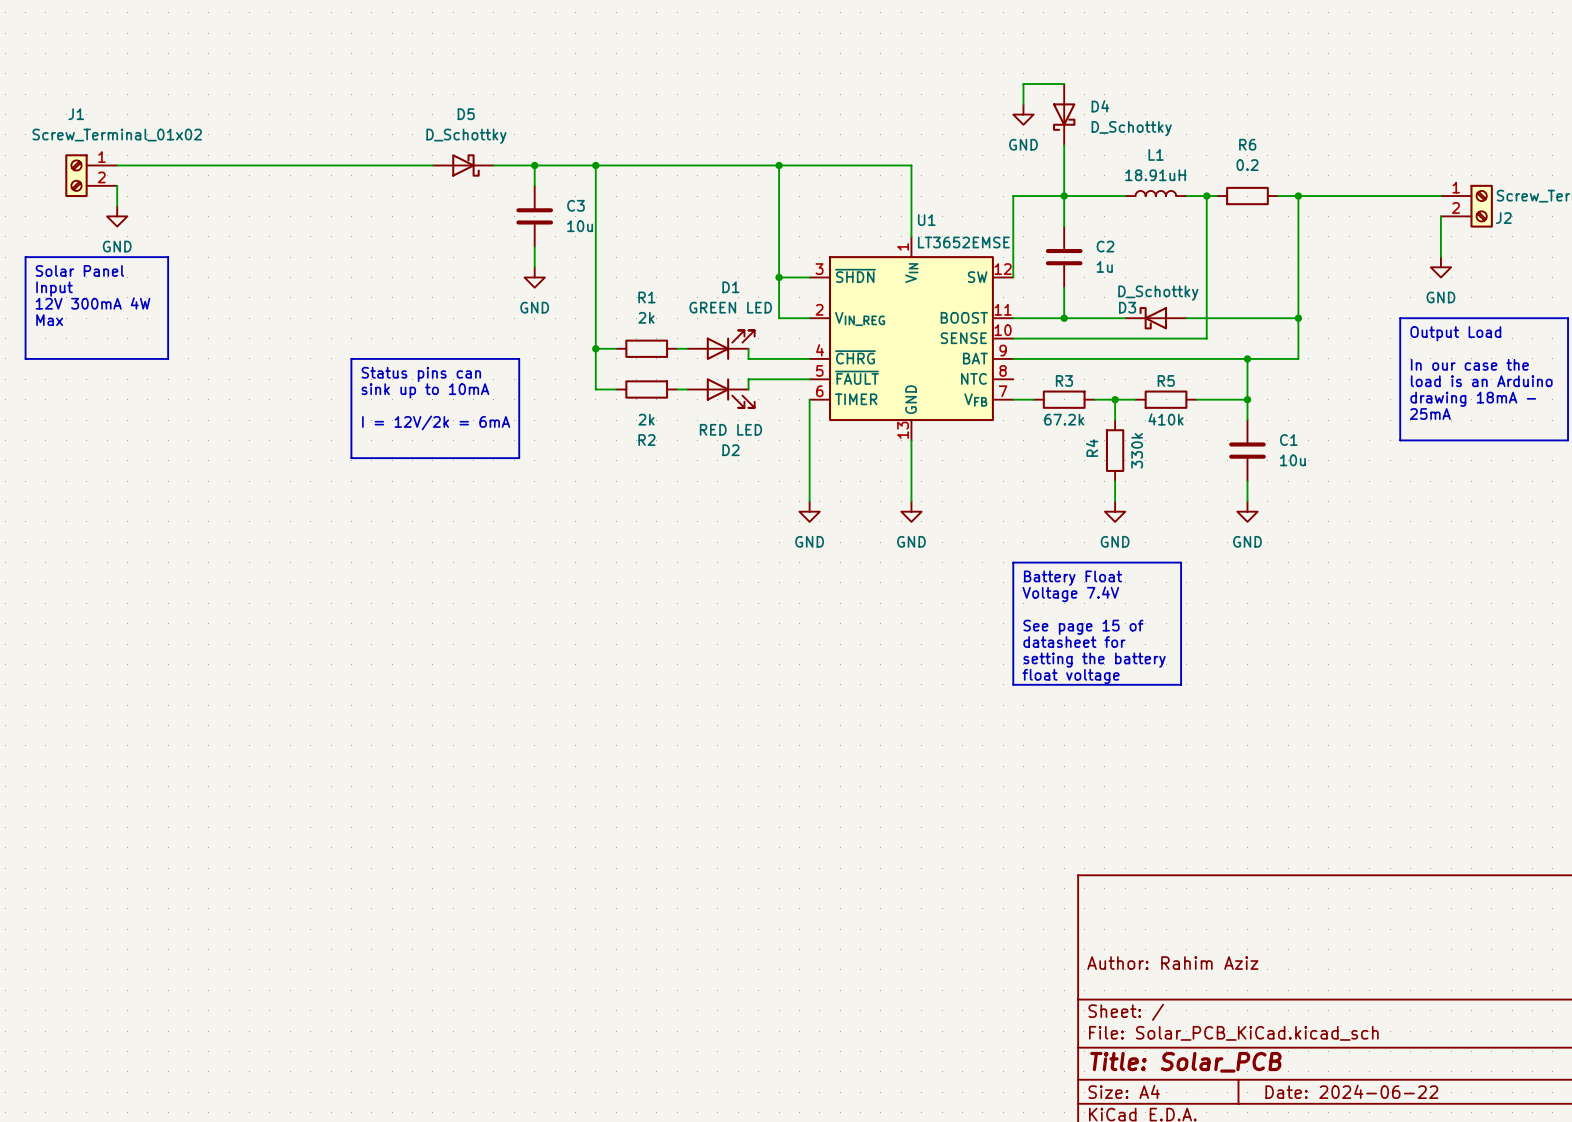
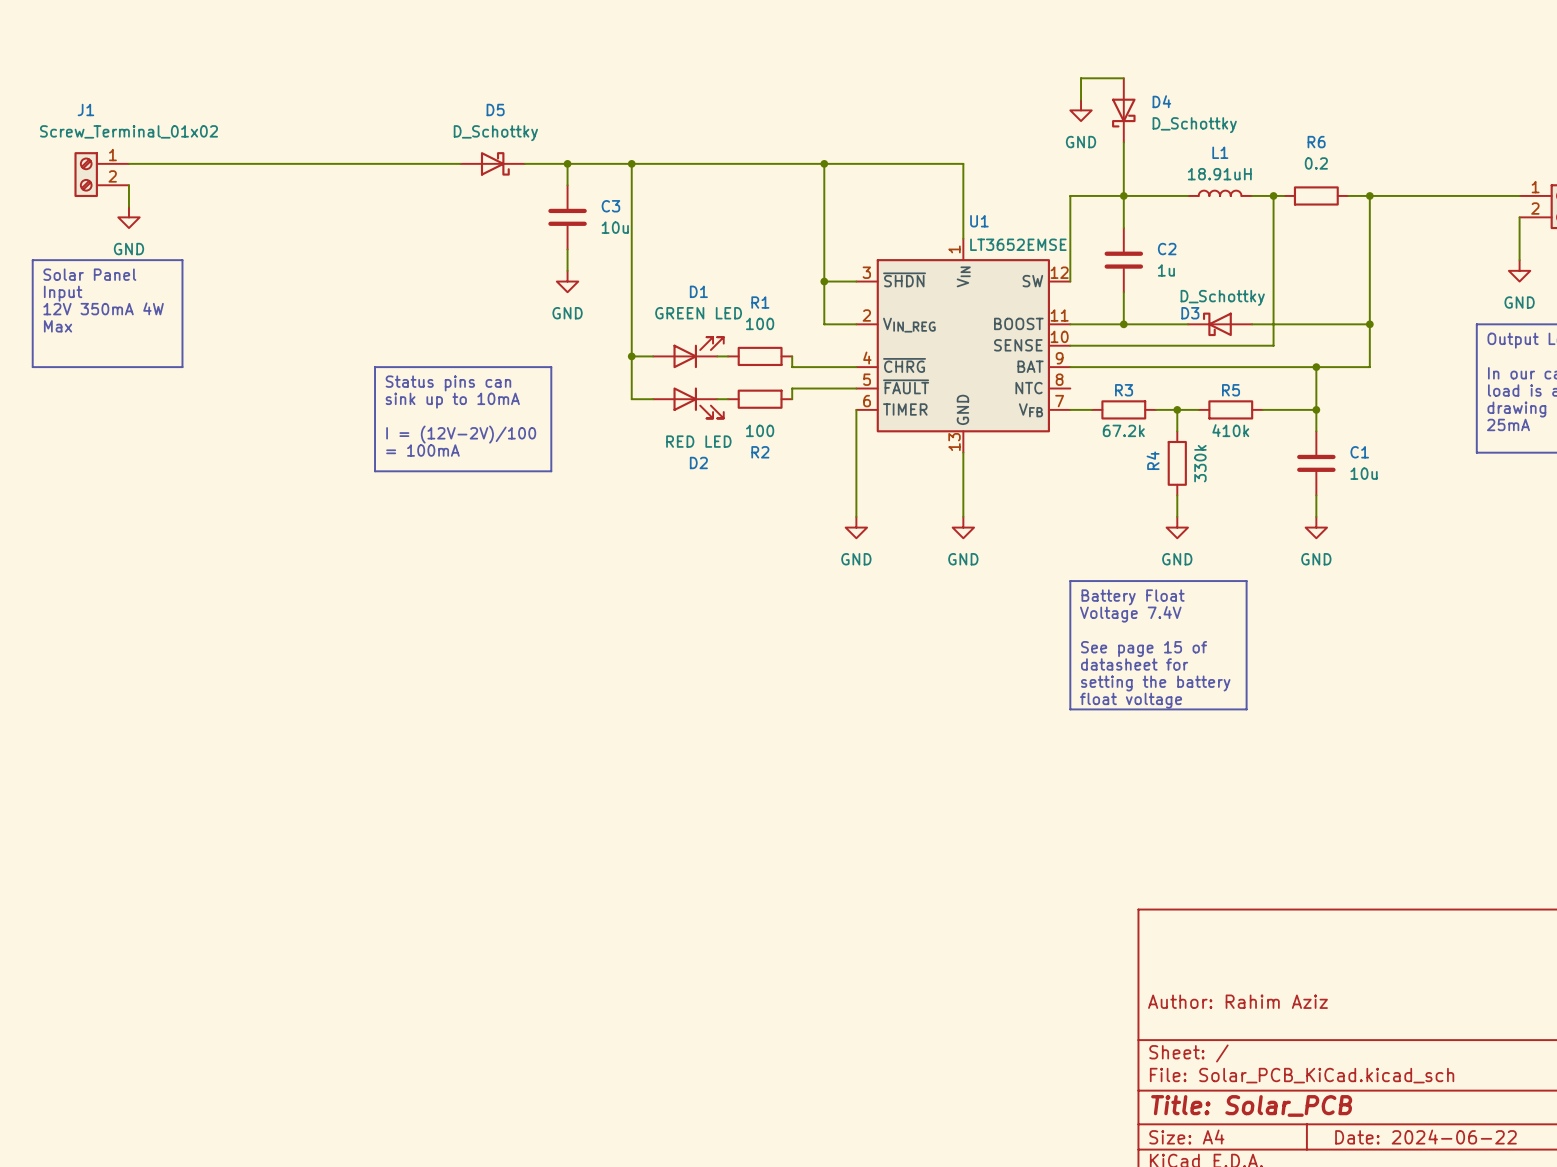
text: 12V 300mA 4W (93, 303) -> 12V 350mA 4W (103, 308)
R1 value: 2k (646, 317) -> 100 (760, 323)
D1 position: (721, 345) -> (688, 352)
R1 position: (646, 348) -> (760, 356)
R2 position: (646, 389) -> (760, 399)
D2 position: (721, 393) -> (688, 402)
R2 value: 2k (646, 419) -> 100 (760, 430)
text: I = 12V/2k = 6mA (436, 422) -> I = (12V-2V)/100 (461, 434)
text: none -> = 100mA (422, 450)

